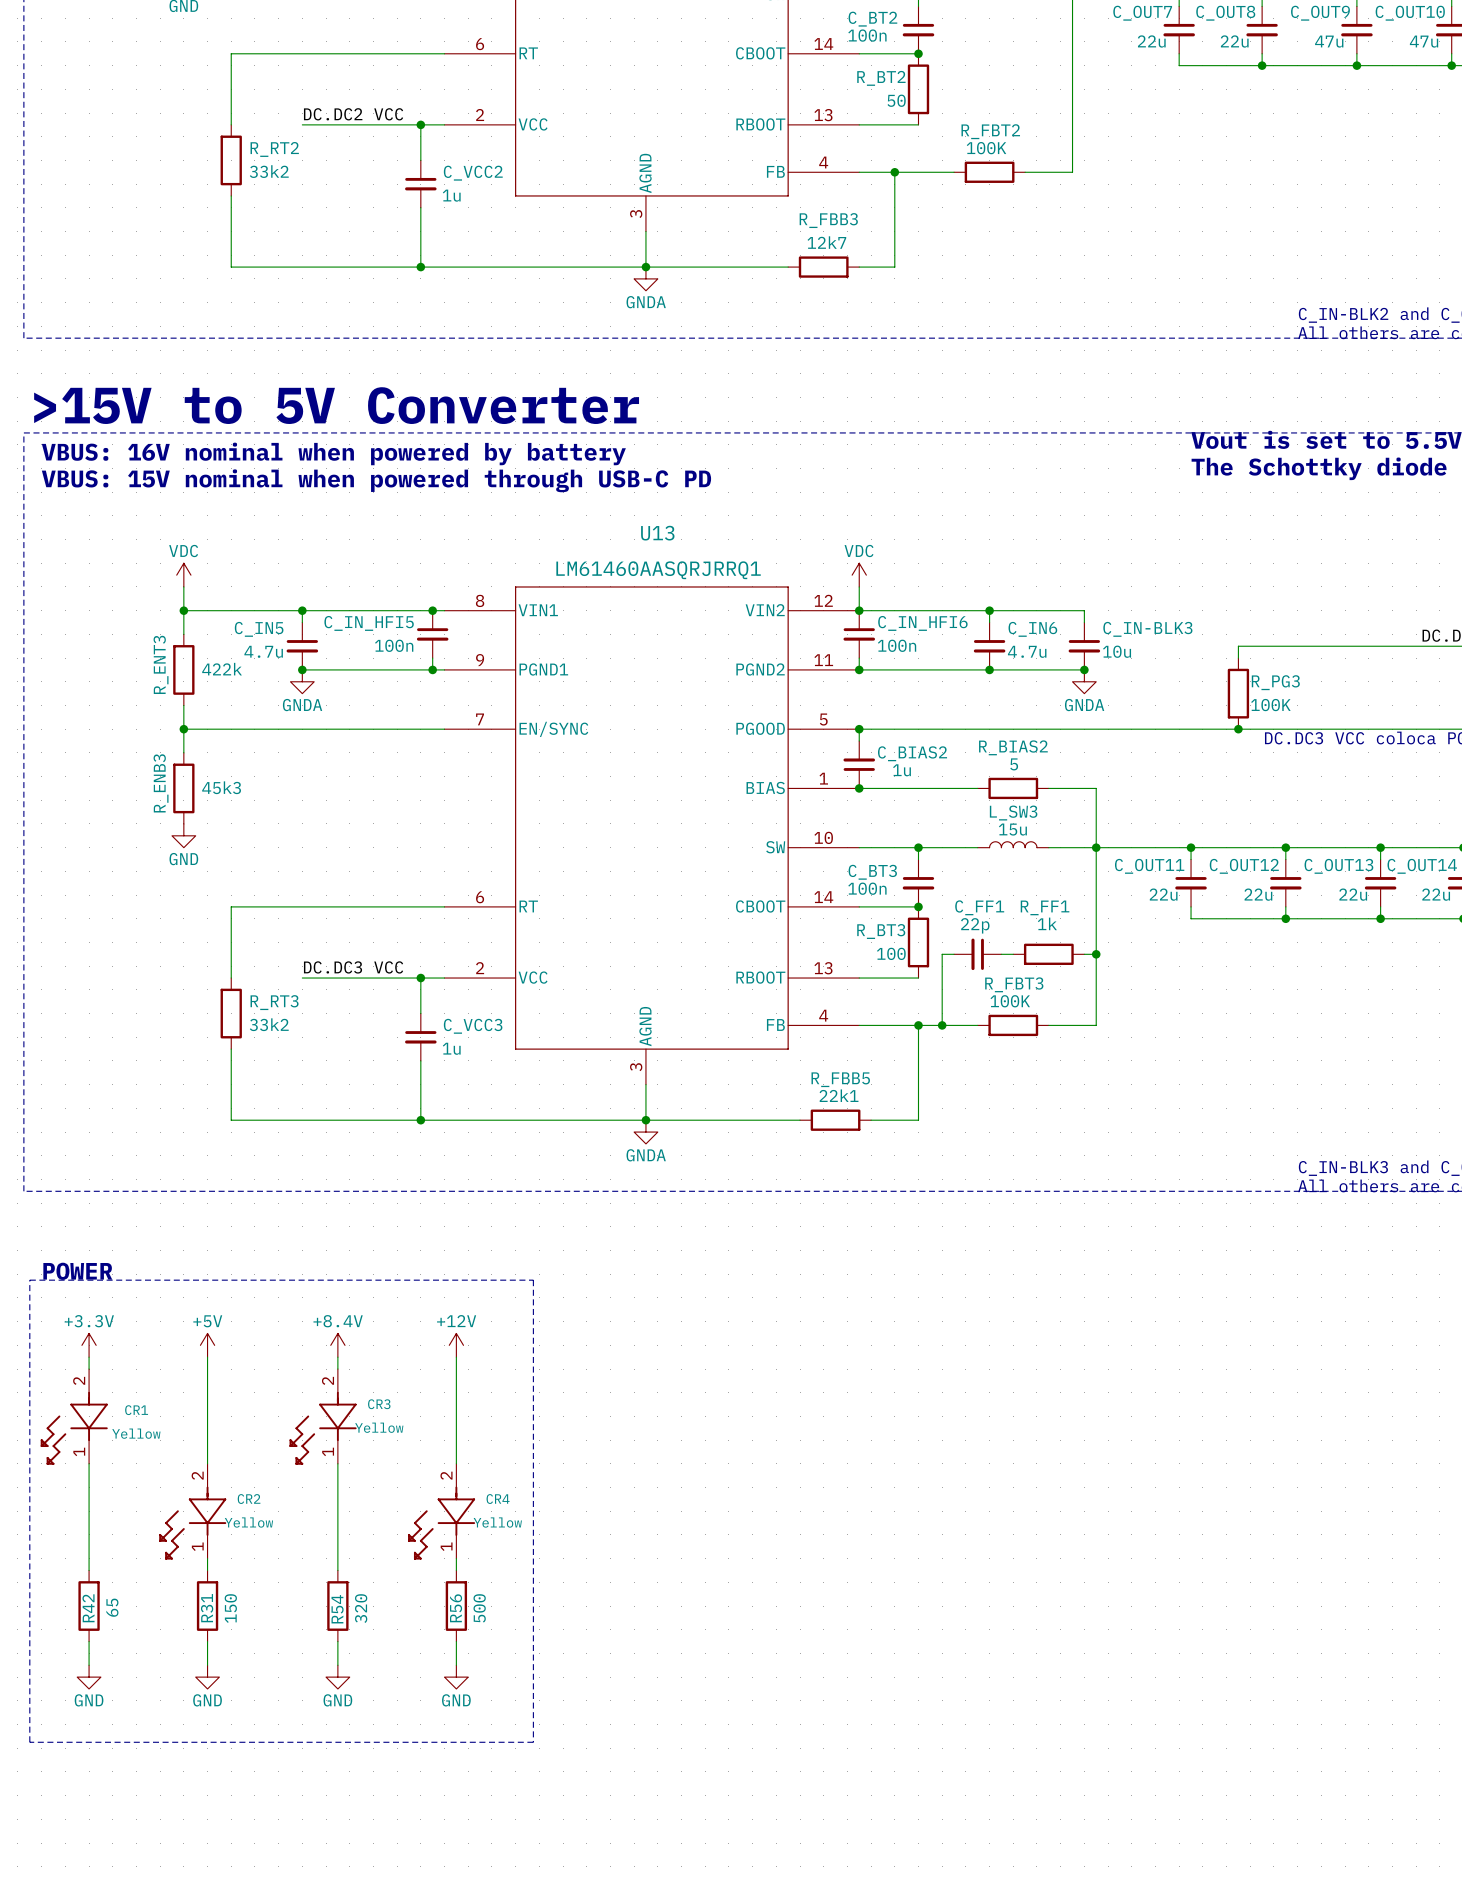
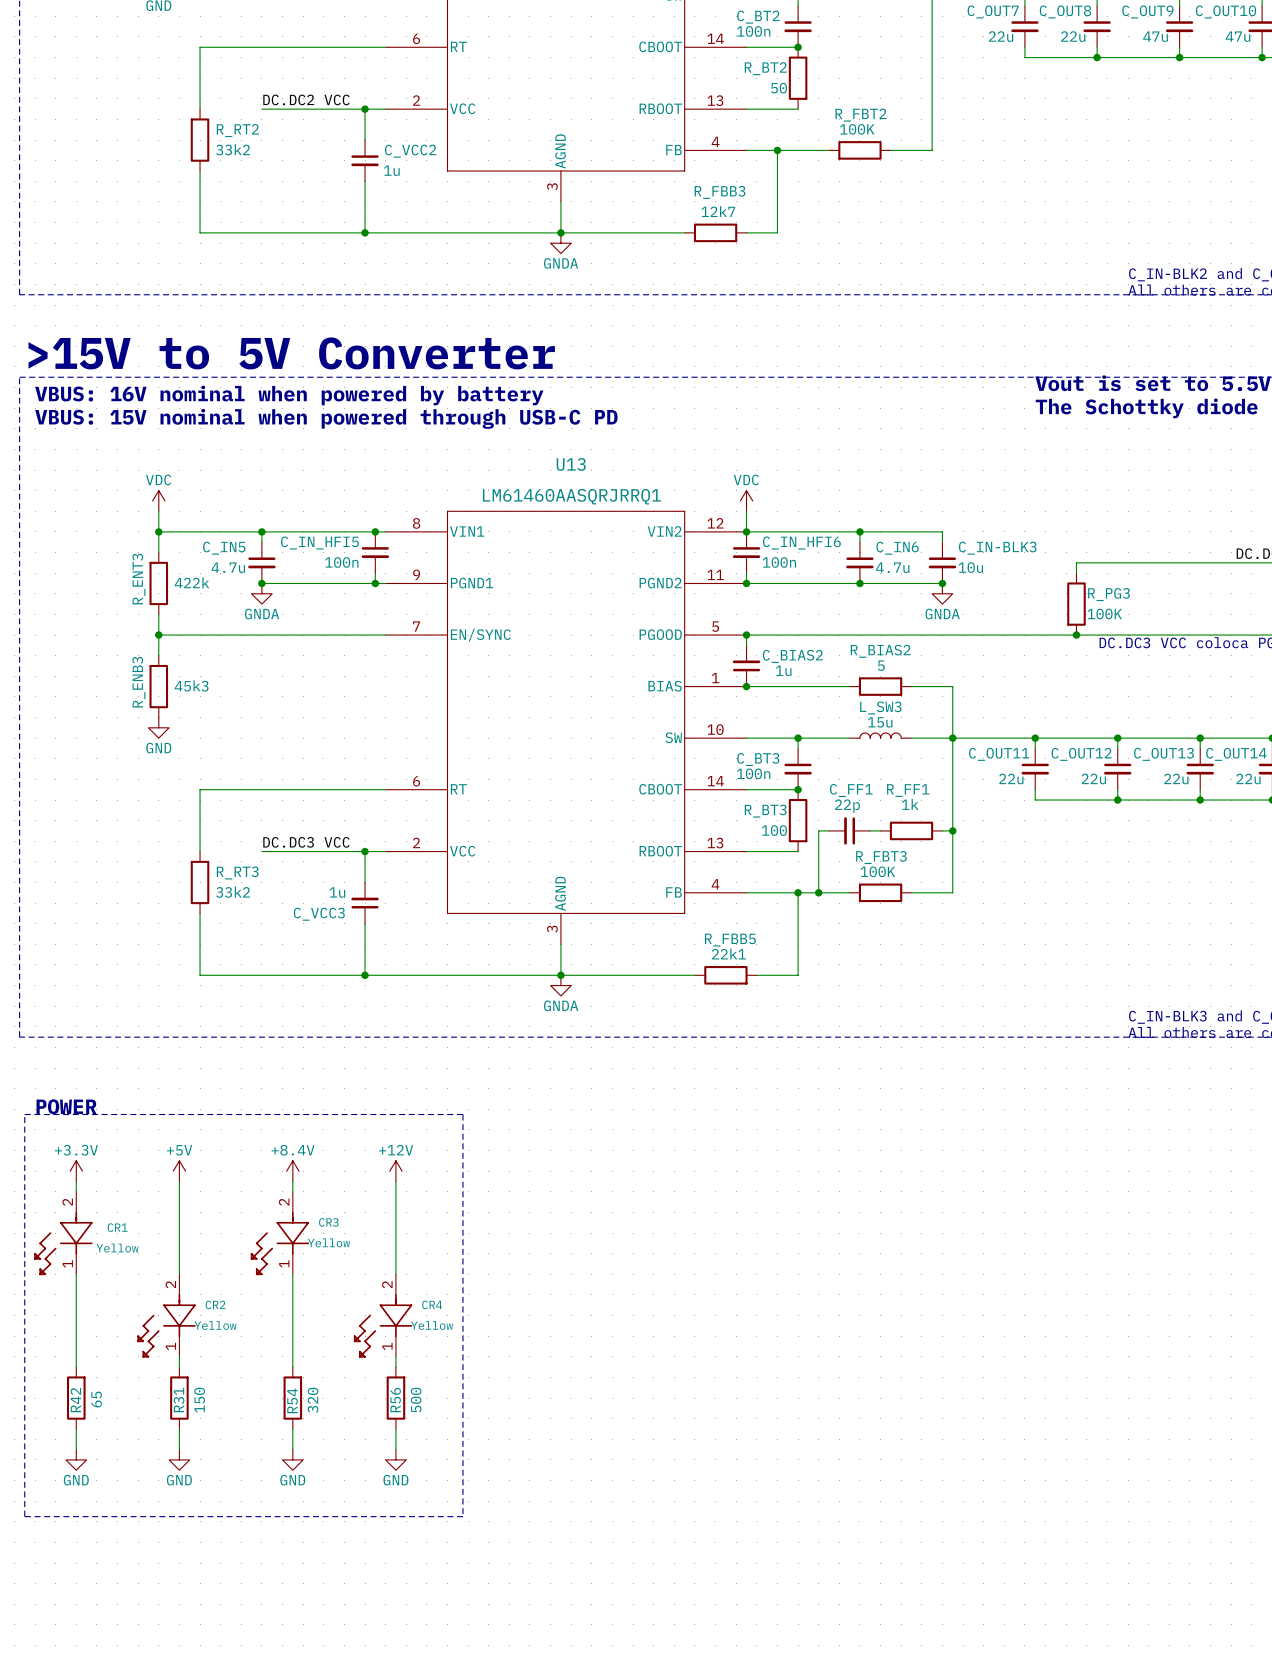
C_VCC3 rotation: 0° (420, 1037) -> 180° (365, 903)

